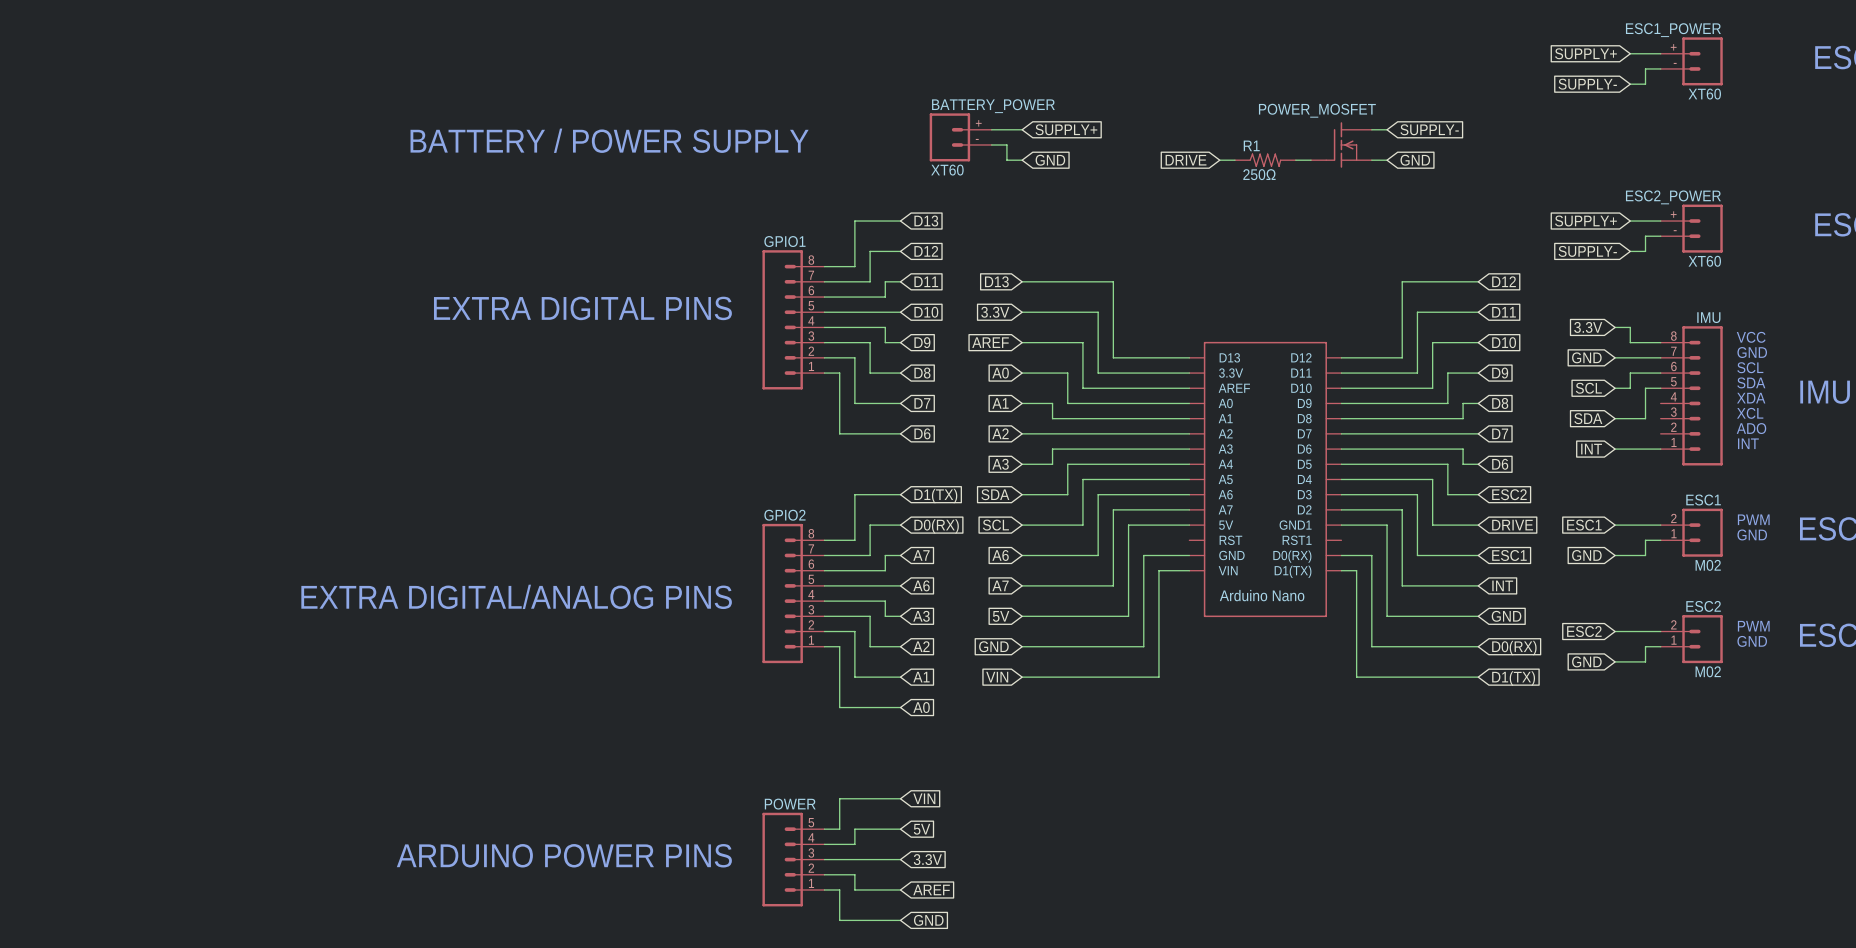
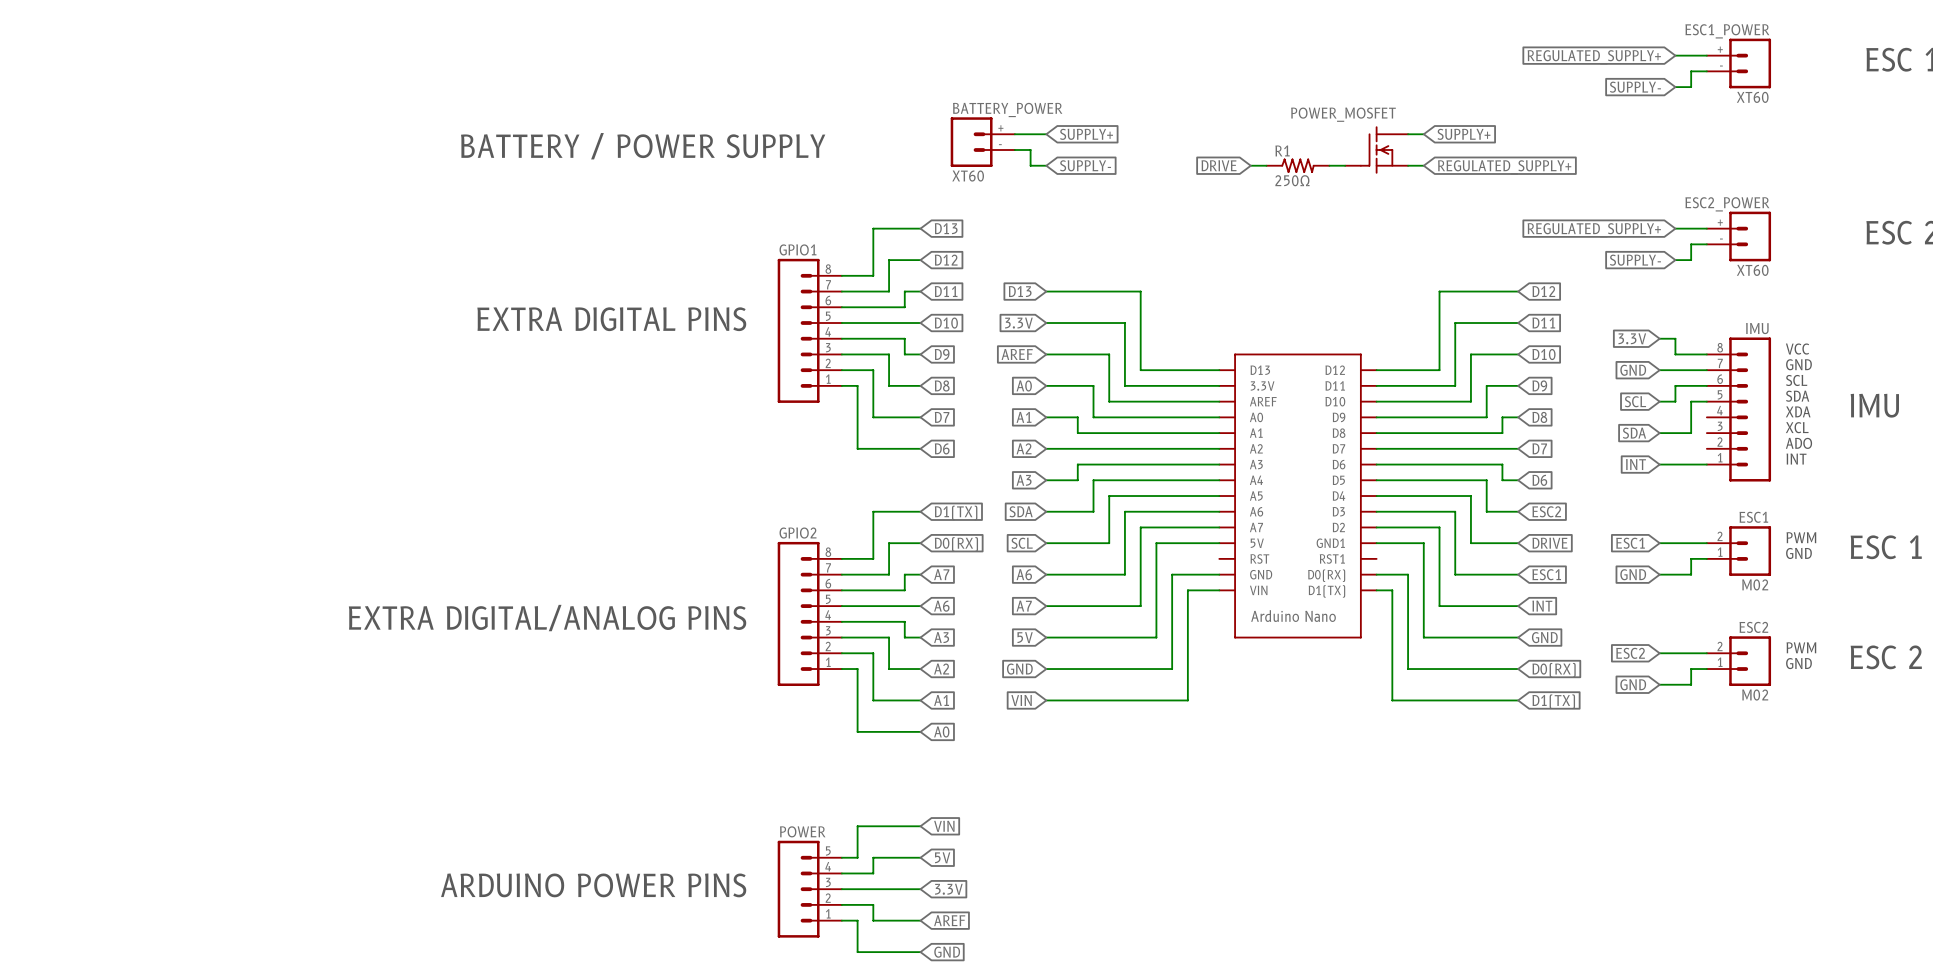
global label: SUPPLY+ (1585, 53) -> REGULATED_SUPPLY+ (1594, 57)
global label: SUPPLY- (1429, 129) -> SUPPLY+ (1463, 134)
global label: GND (1050, 160) -> SUPPLY- (1085, 165)
global label: GND (1415, 160) -> REGULATED_SUPPLY+ (1504, 167)
global label: SUPPLY+ (1585, 221) -> REGULATED_SUPPLY+ (1594, 230)

